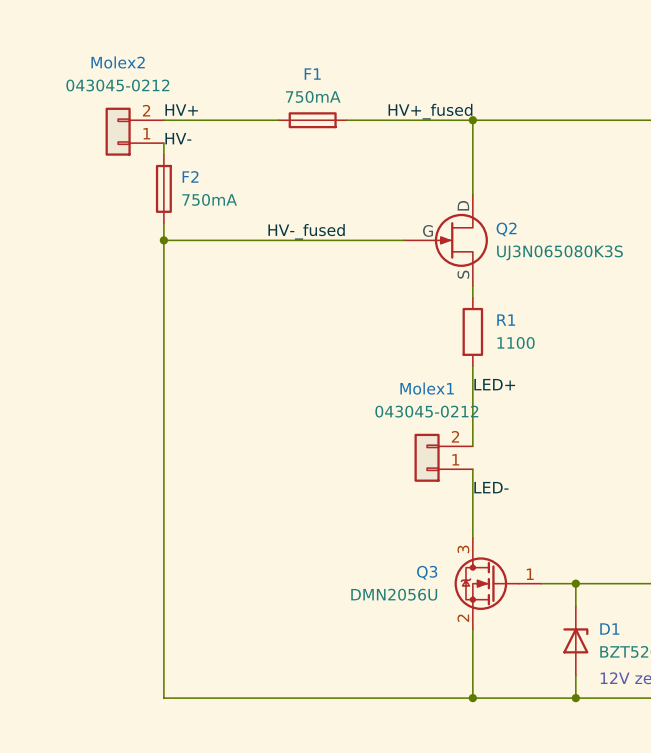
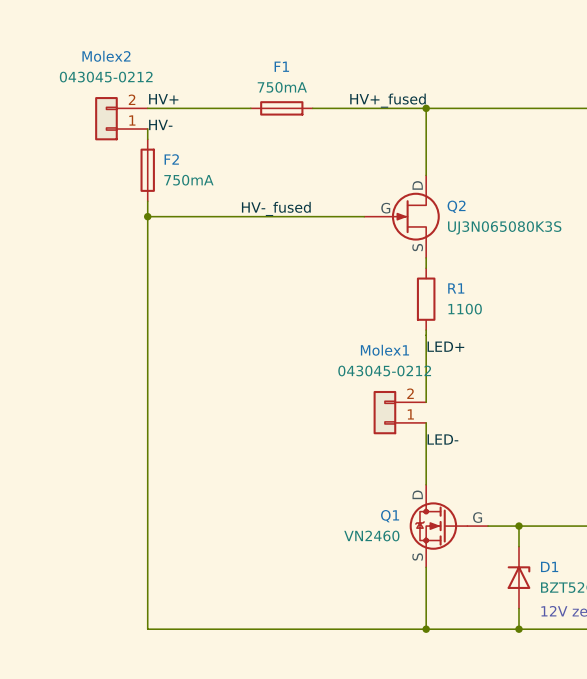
Q3 pin name: none -> D (417, 494)
Q3 pin number: 3 (463, 549) -> none
Q3 name: Q3 (427, 572) -> Q1 (390, 516)
Q3 pin name: none -> G (477, 517)
Q3 pin number: 1 (530, 574) -> none
Q3 value: DMN2056U (394, 594) -> VN2460 (371, 536)
Q3 pin name: none -> S (417, 556)
Q3 pin number: 2 (463, 618) -> none

